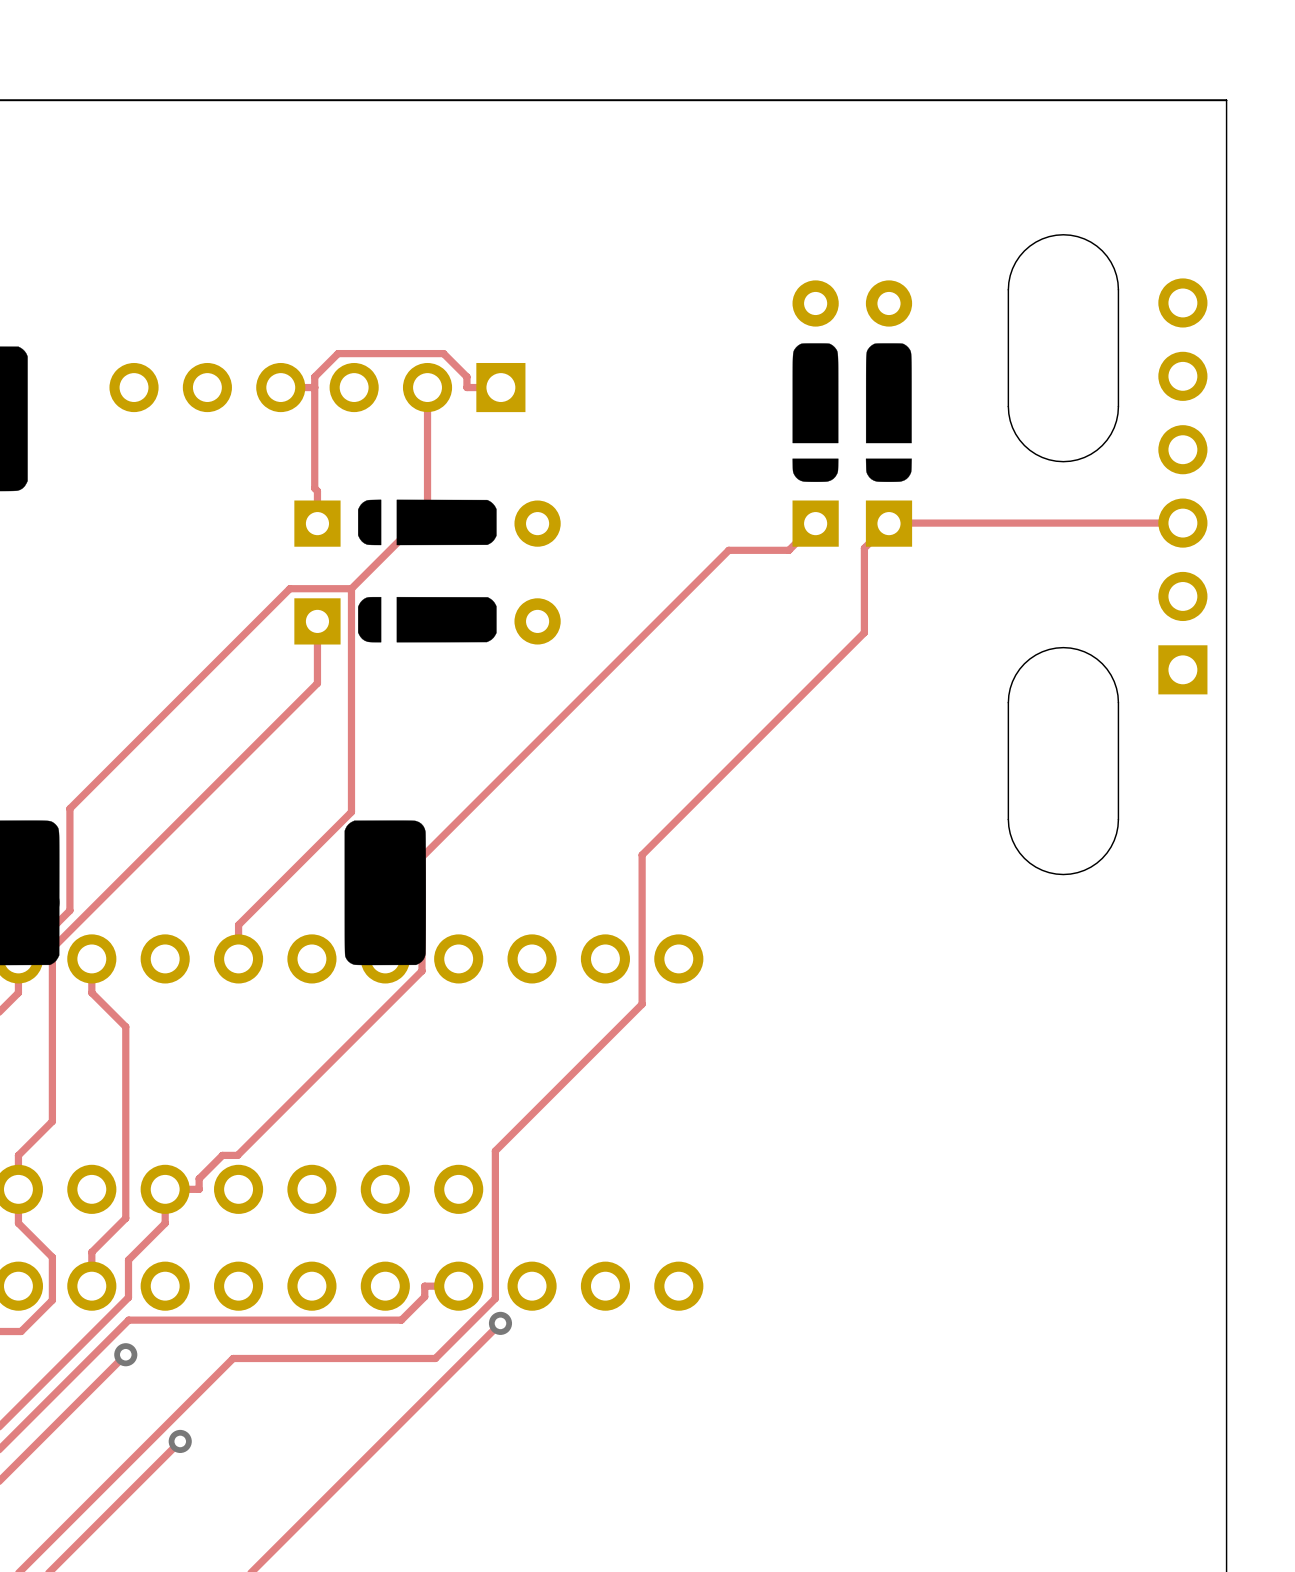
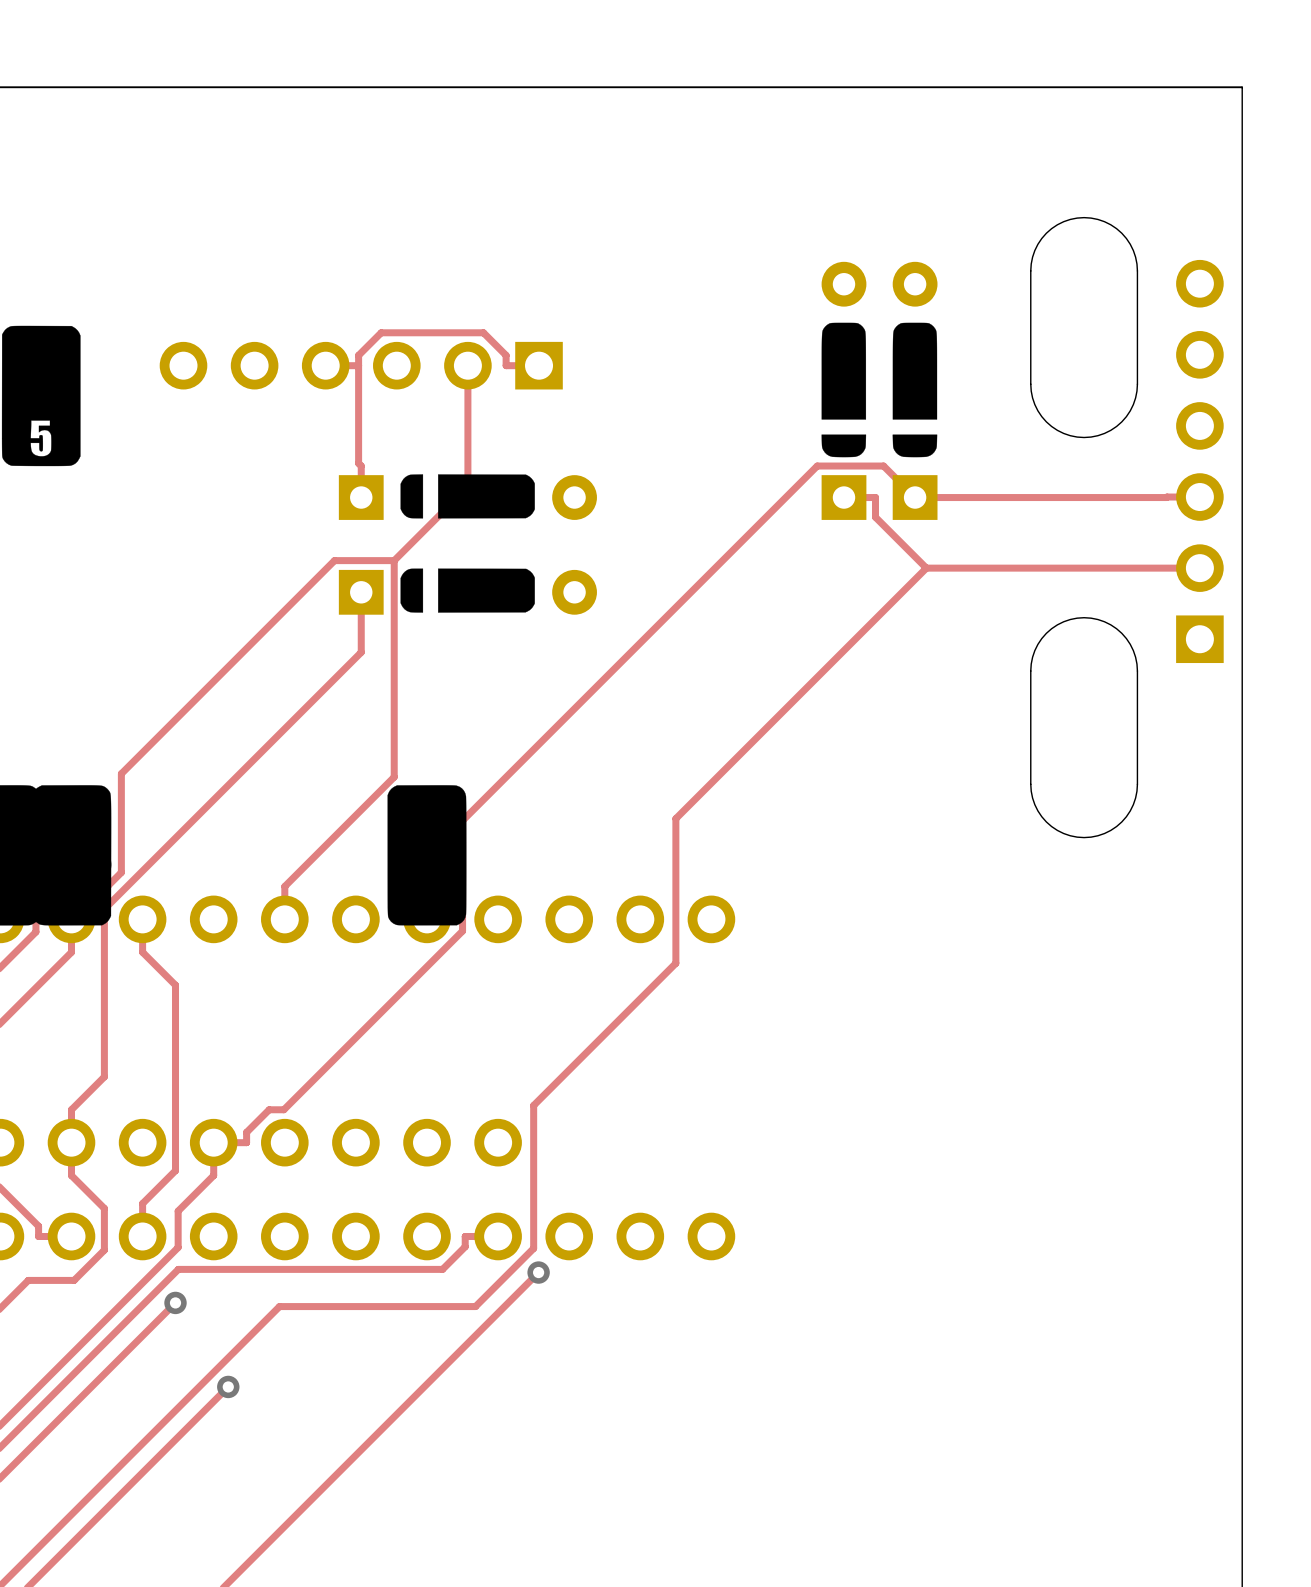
track: (815, 523) (788, 550) (728, 550) -> (844, 497) (875, 497) (875, 517) (926, 568)
track: (1148, 523) (889, 523) (864, 548) (864, 632) -> (1167, 497) (915, 497) (883, 466) (817, 466) (759, 523)
track: none -> (926, 568) (891, 603)
track: none -> (926, 568) (1199, 568)

